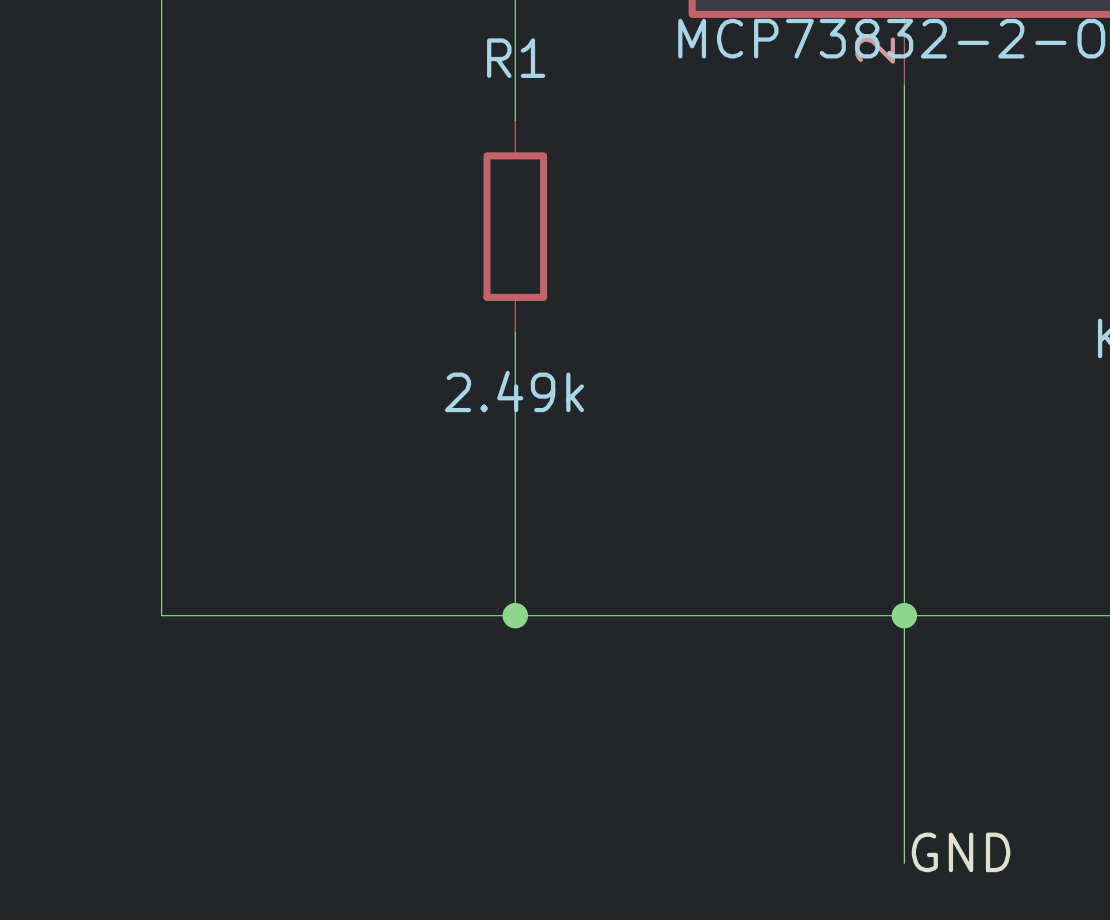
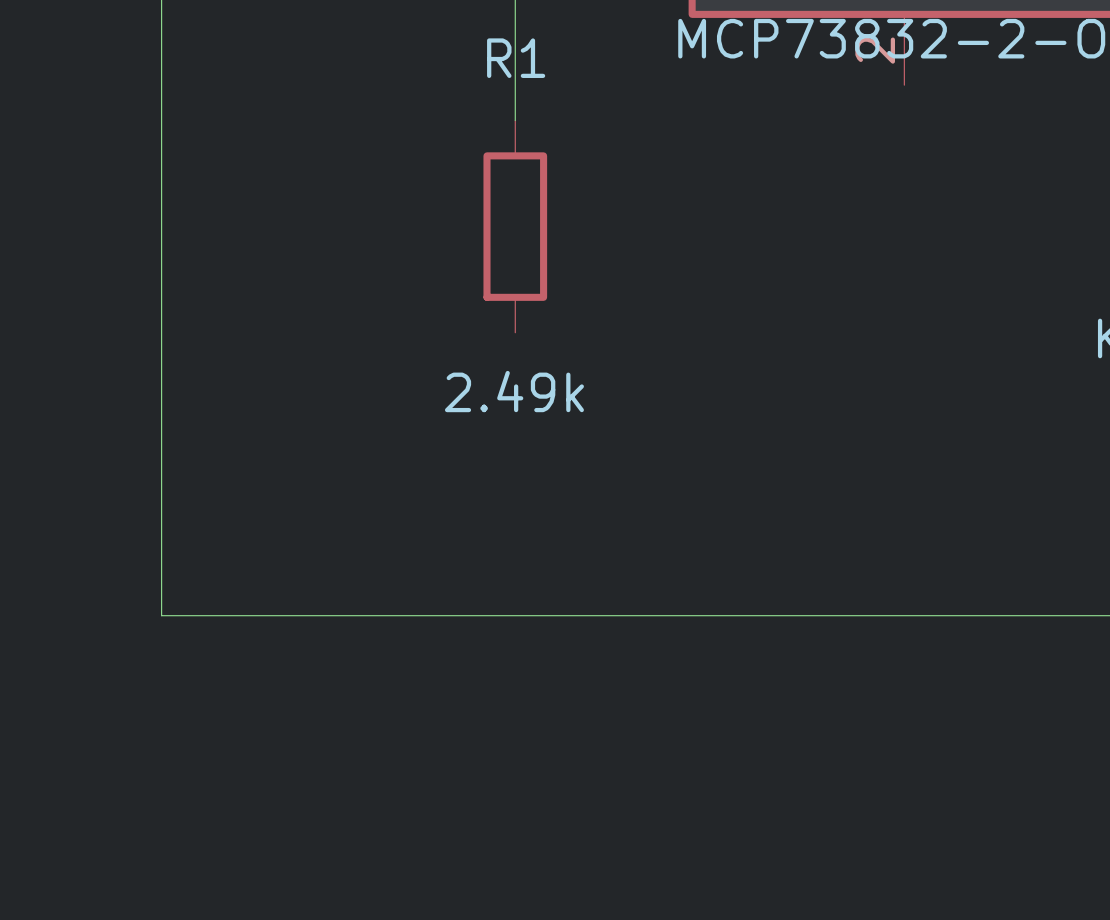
wire: (904, 85) (904, 863) -> none
wire: (515, 332) (515, 615) -> none
junction: (515, 615) -> none
junction: (904, 615) -> none
label: GND (961, 852) -> none

